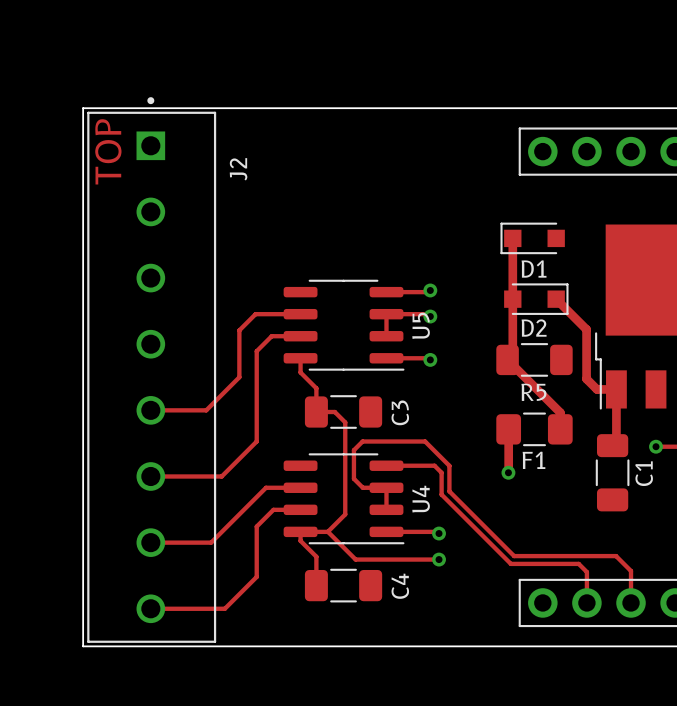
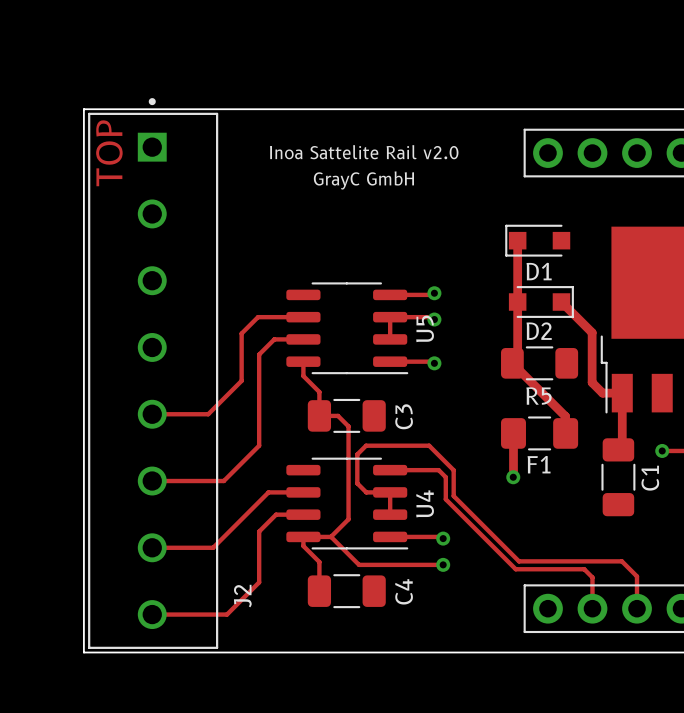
text: none -> Inoa Sattelite Rail v2.0 (364, 152)
J2 name position: J2 (238, 169) -> J2 (242, 596)
text: none -> GrayC GmbH (363, 180)

